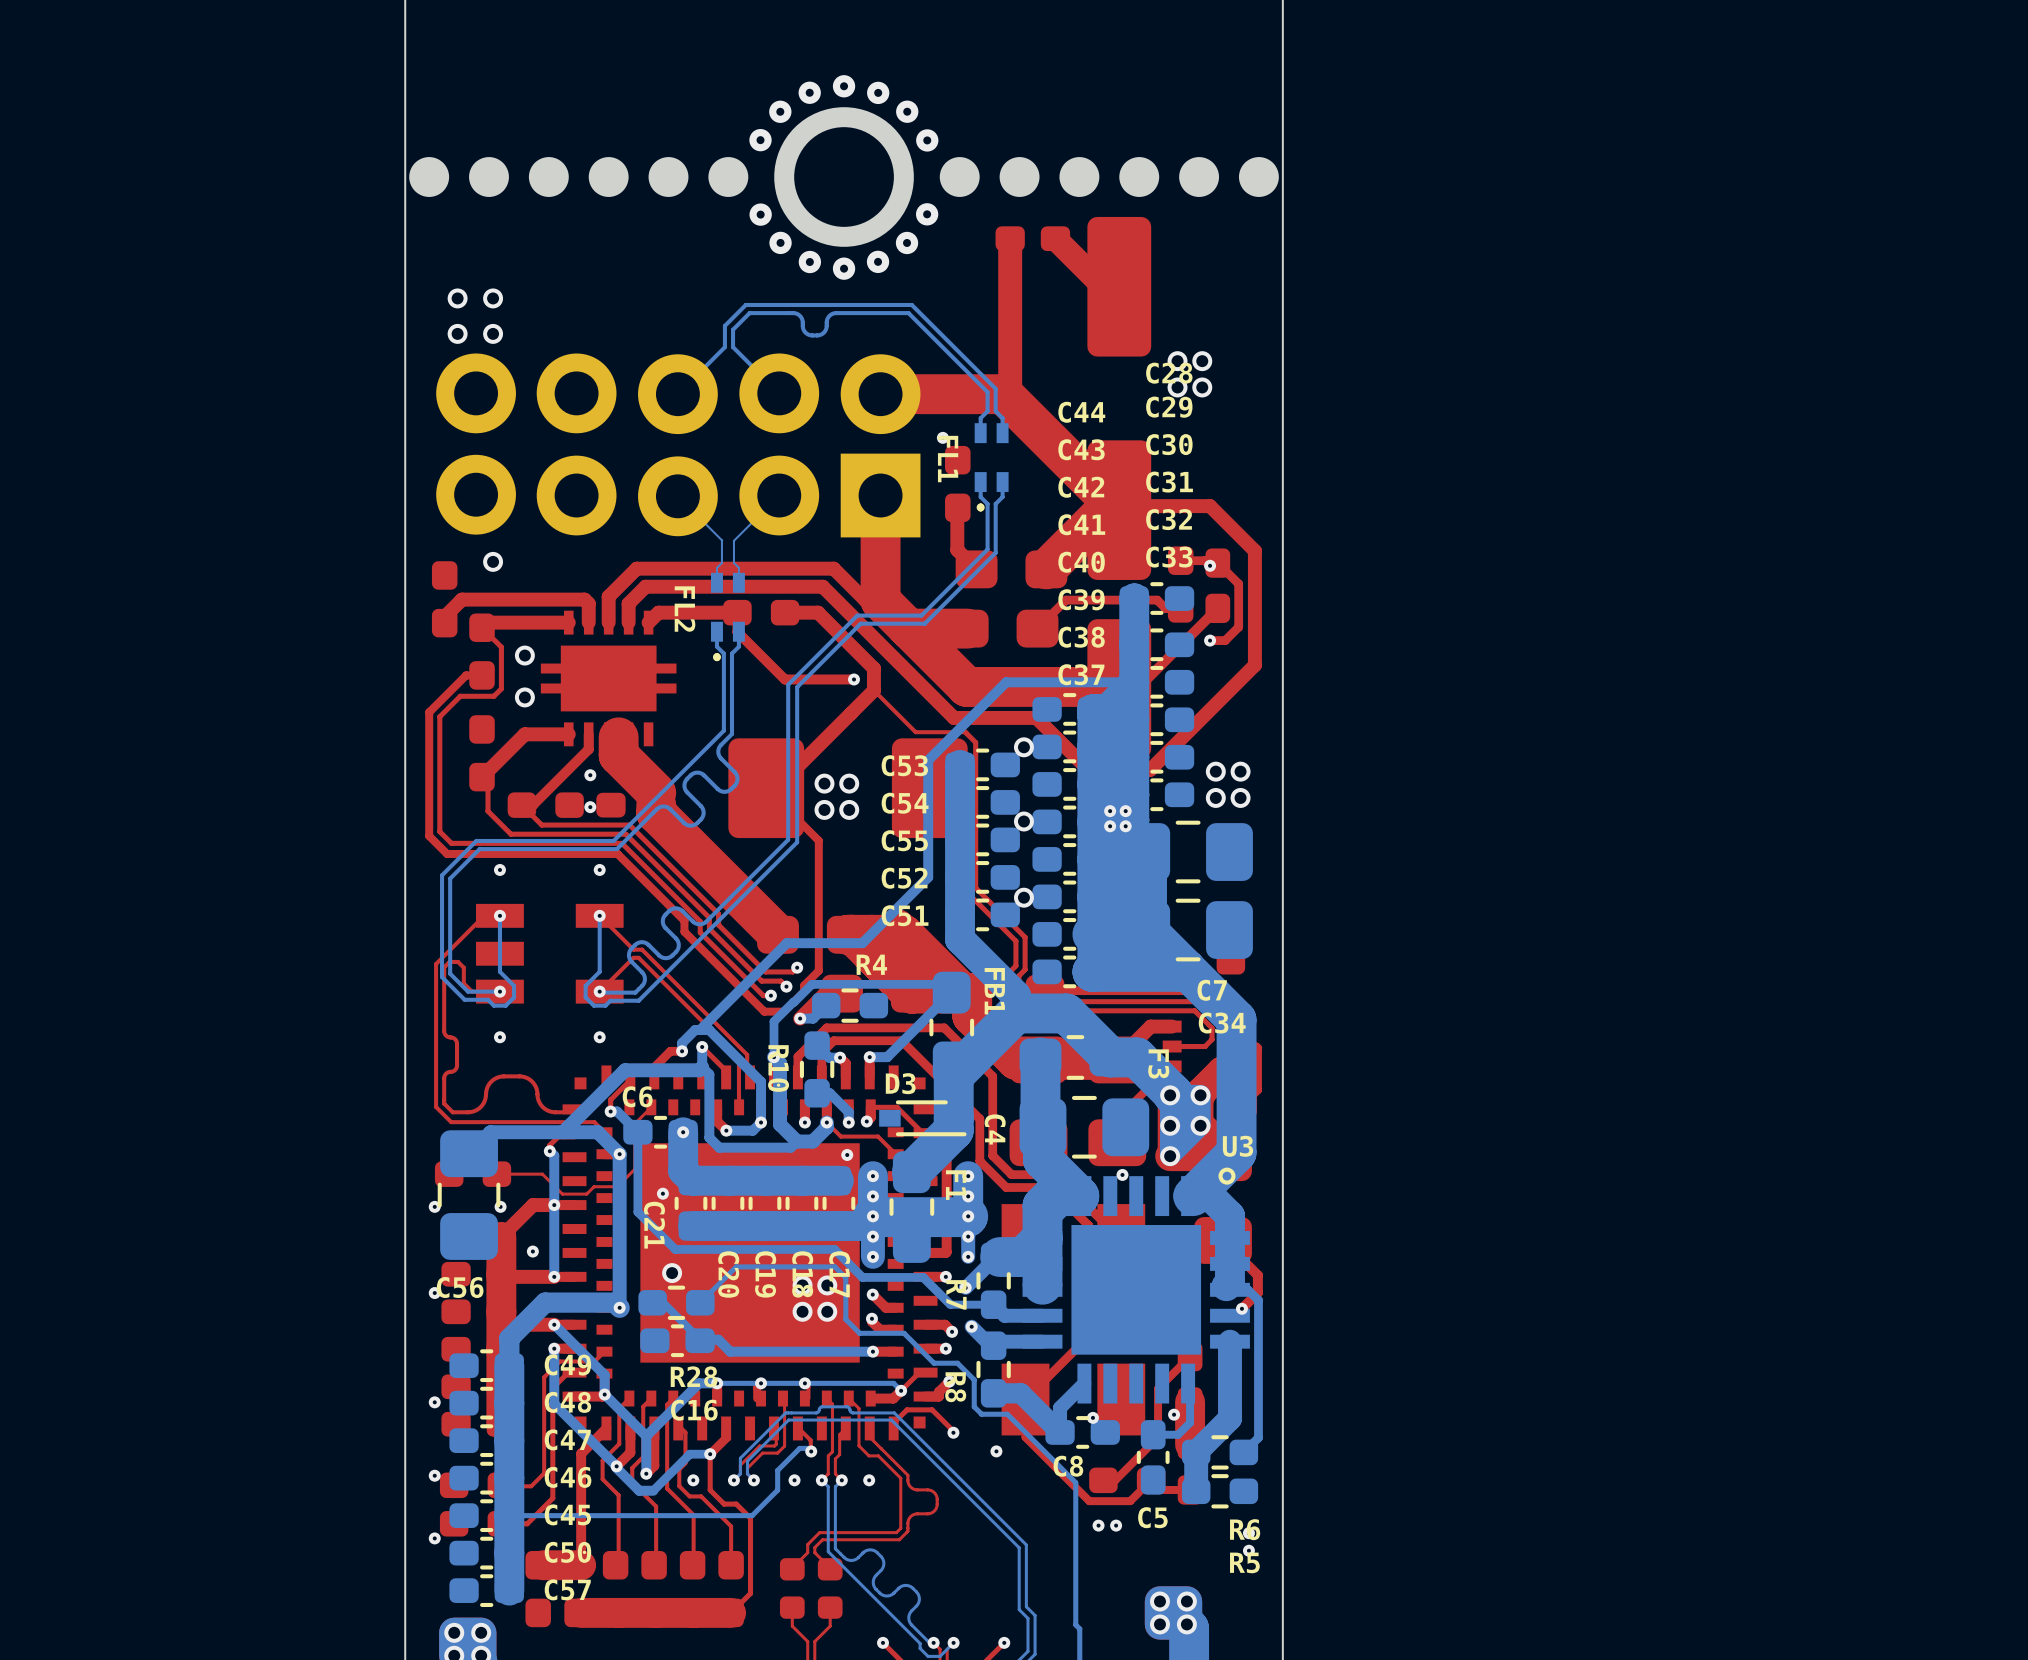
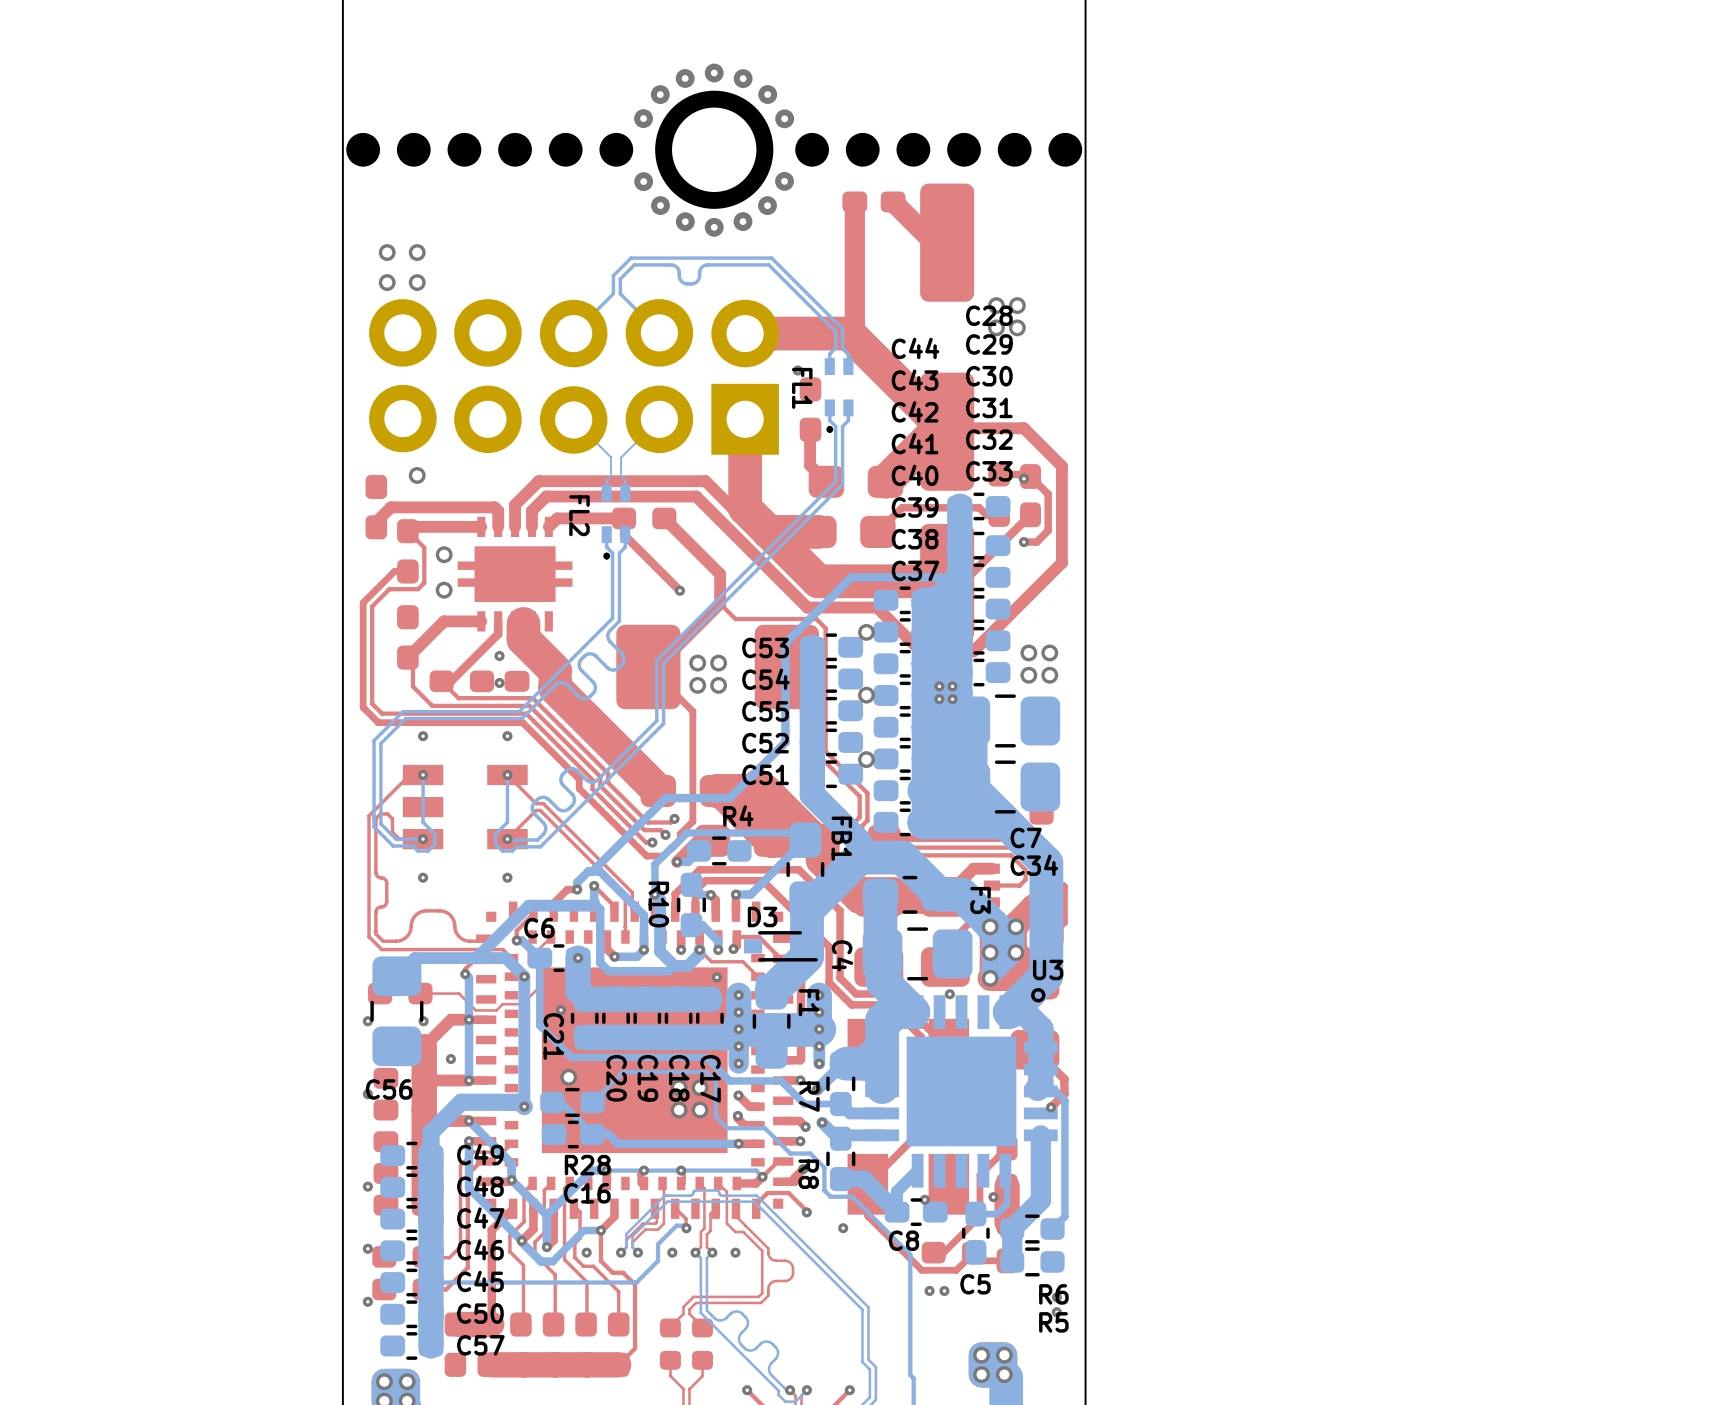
bottom track: (987, 549) (921, 615) (857, 615) (788, 684) (788, 839) (776, 851) -> (835, 464) (835, 481) (656, 660) (656, 720)
bottom track: (995, 552) (924, 623) (860, 623) (797, 687) (797, 842) (784, 855) -> (842, 467) (842, 484) (663, 663) (663, 723)
top track: (785, 612) (818, 612) (873, 668) (873, 690) -> (664, 518) (720, 574) (720, 603) (735, 619) (816, 619)
top track: (854, 679) (784, 679) -> (679, 590) (664, 574)
via position: (854, 679) -> (679, 590)
top track: (873, 690) (915, 732) (966, 732) -> none
top track: (873, 690) (851, 713) -> none

